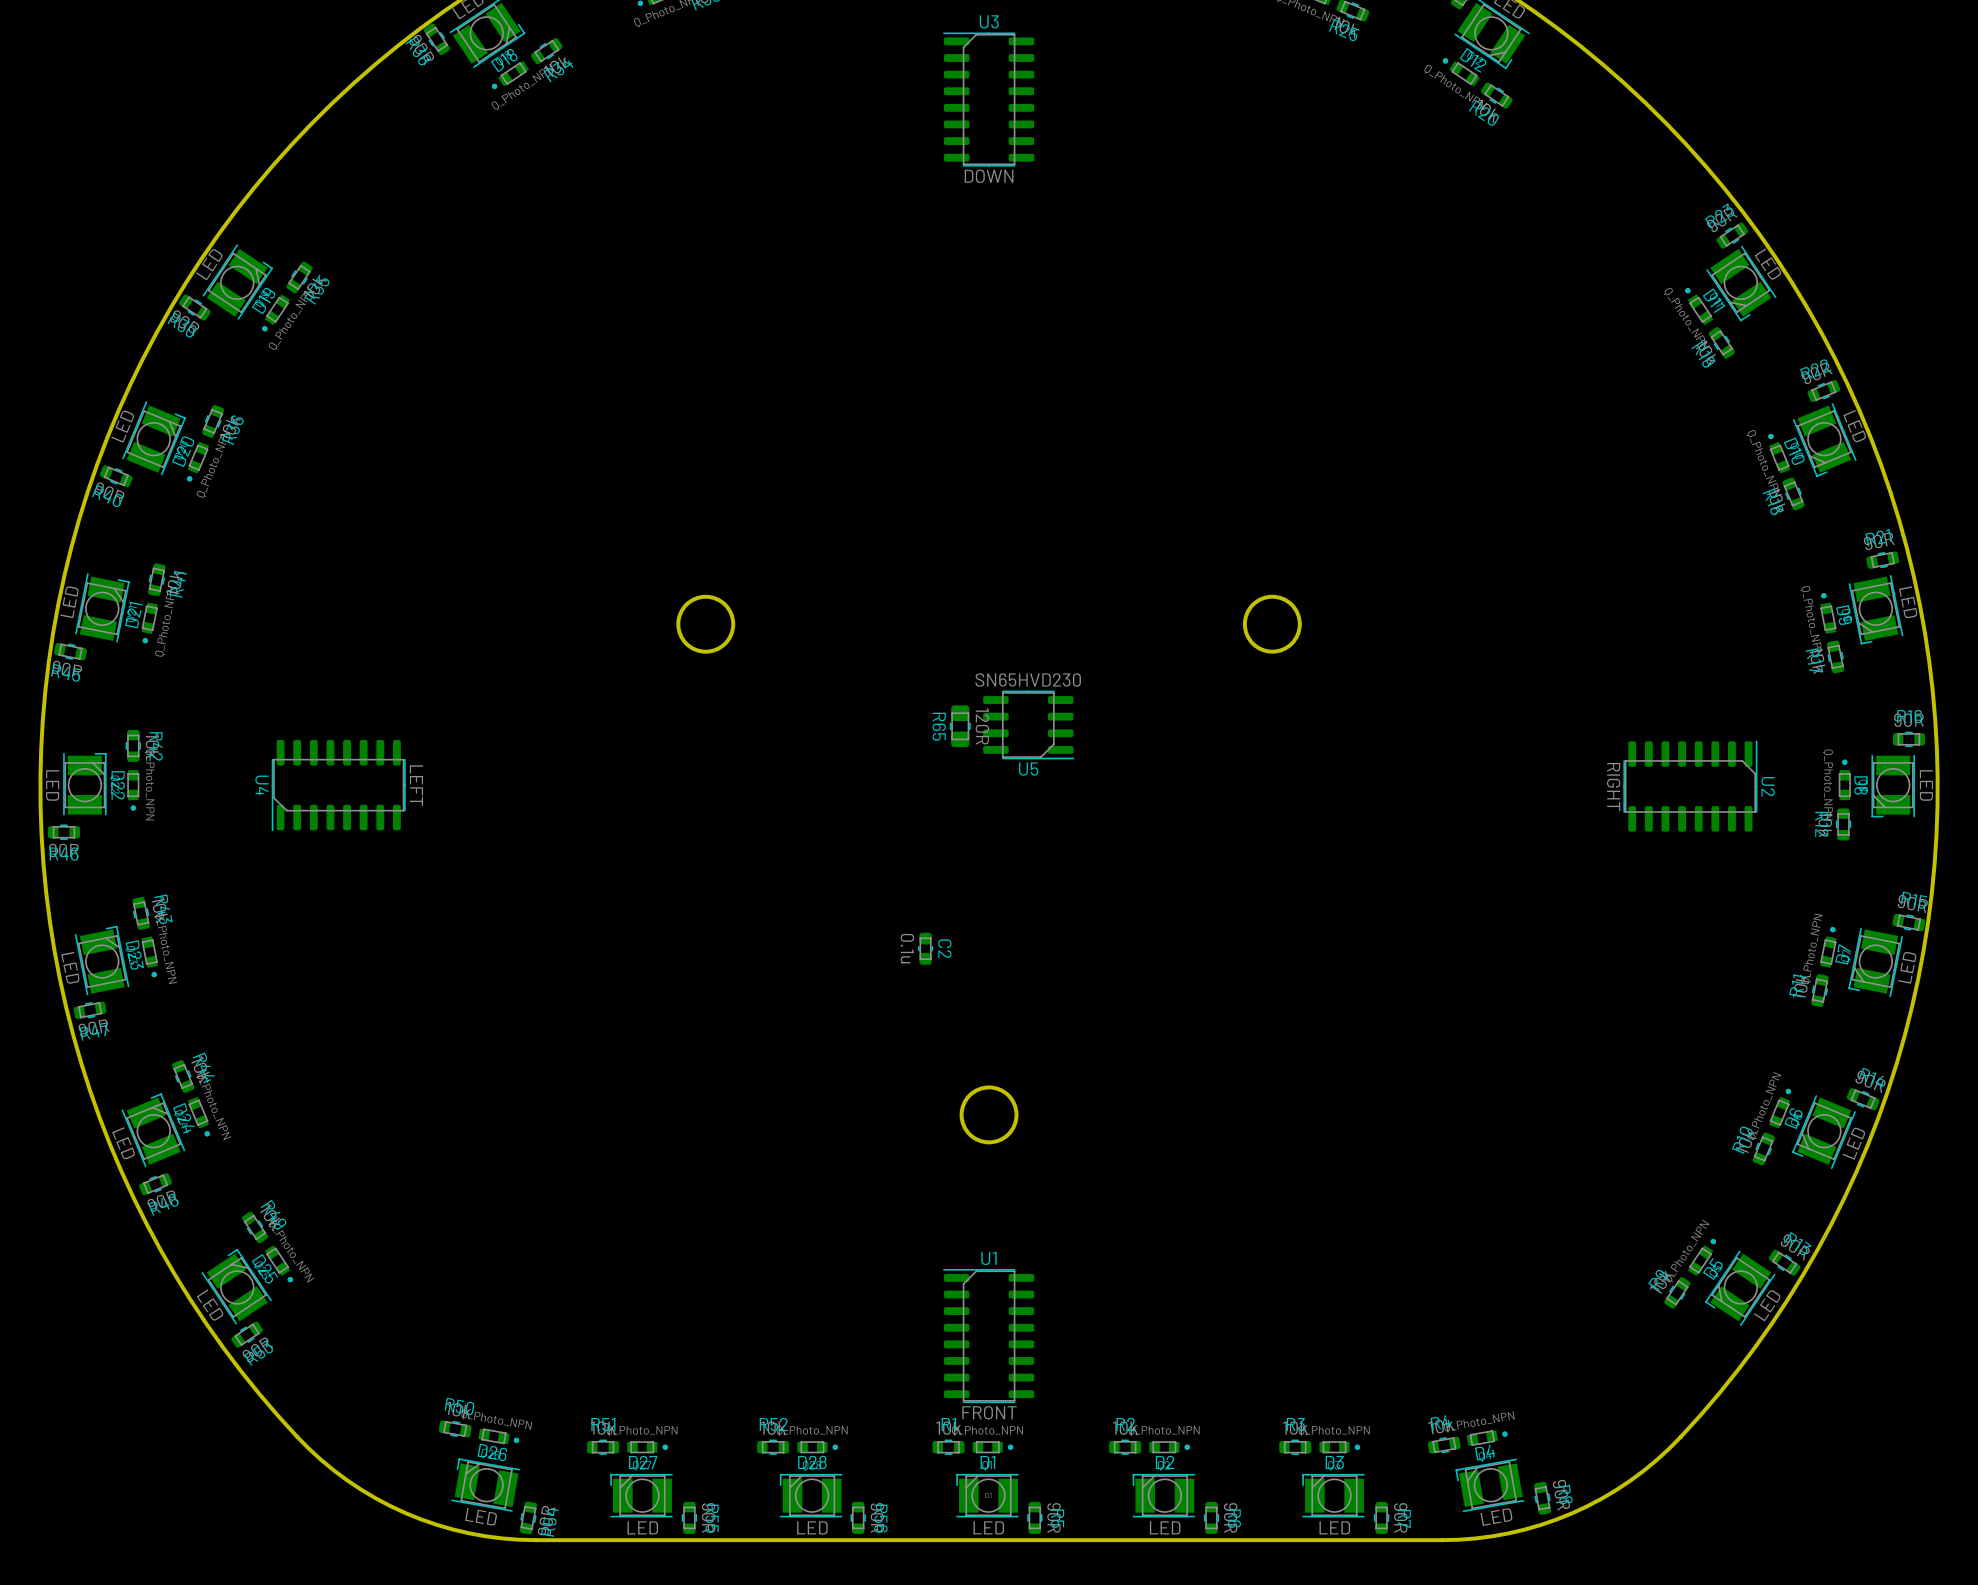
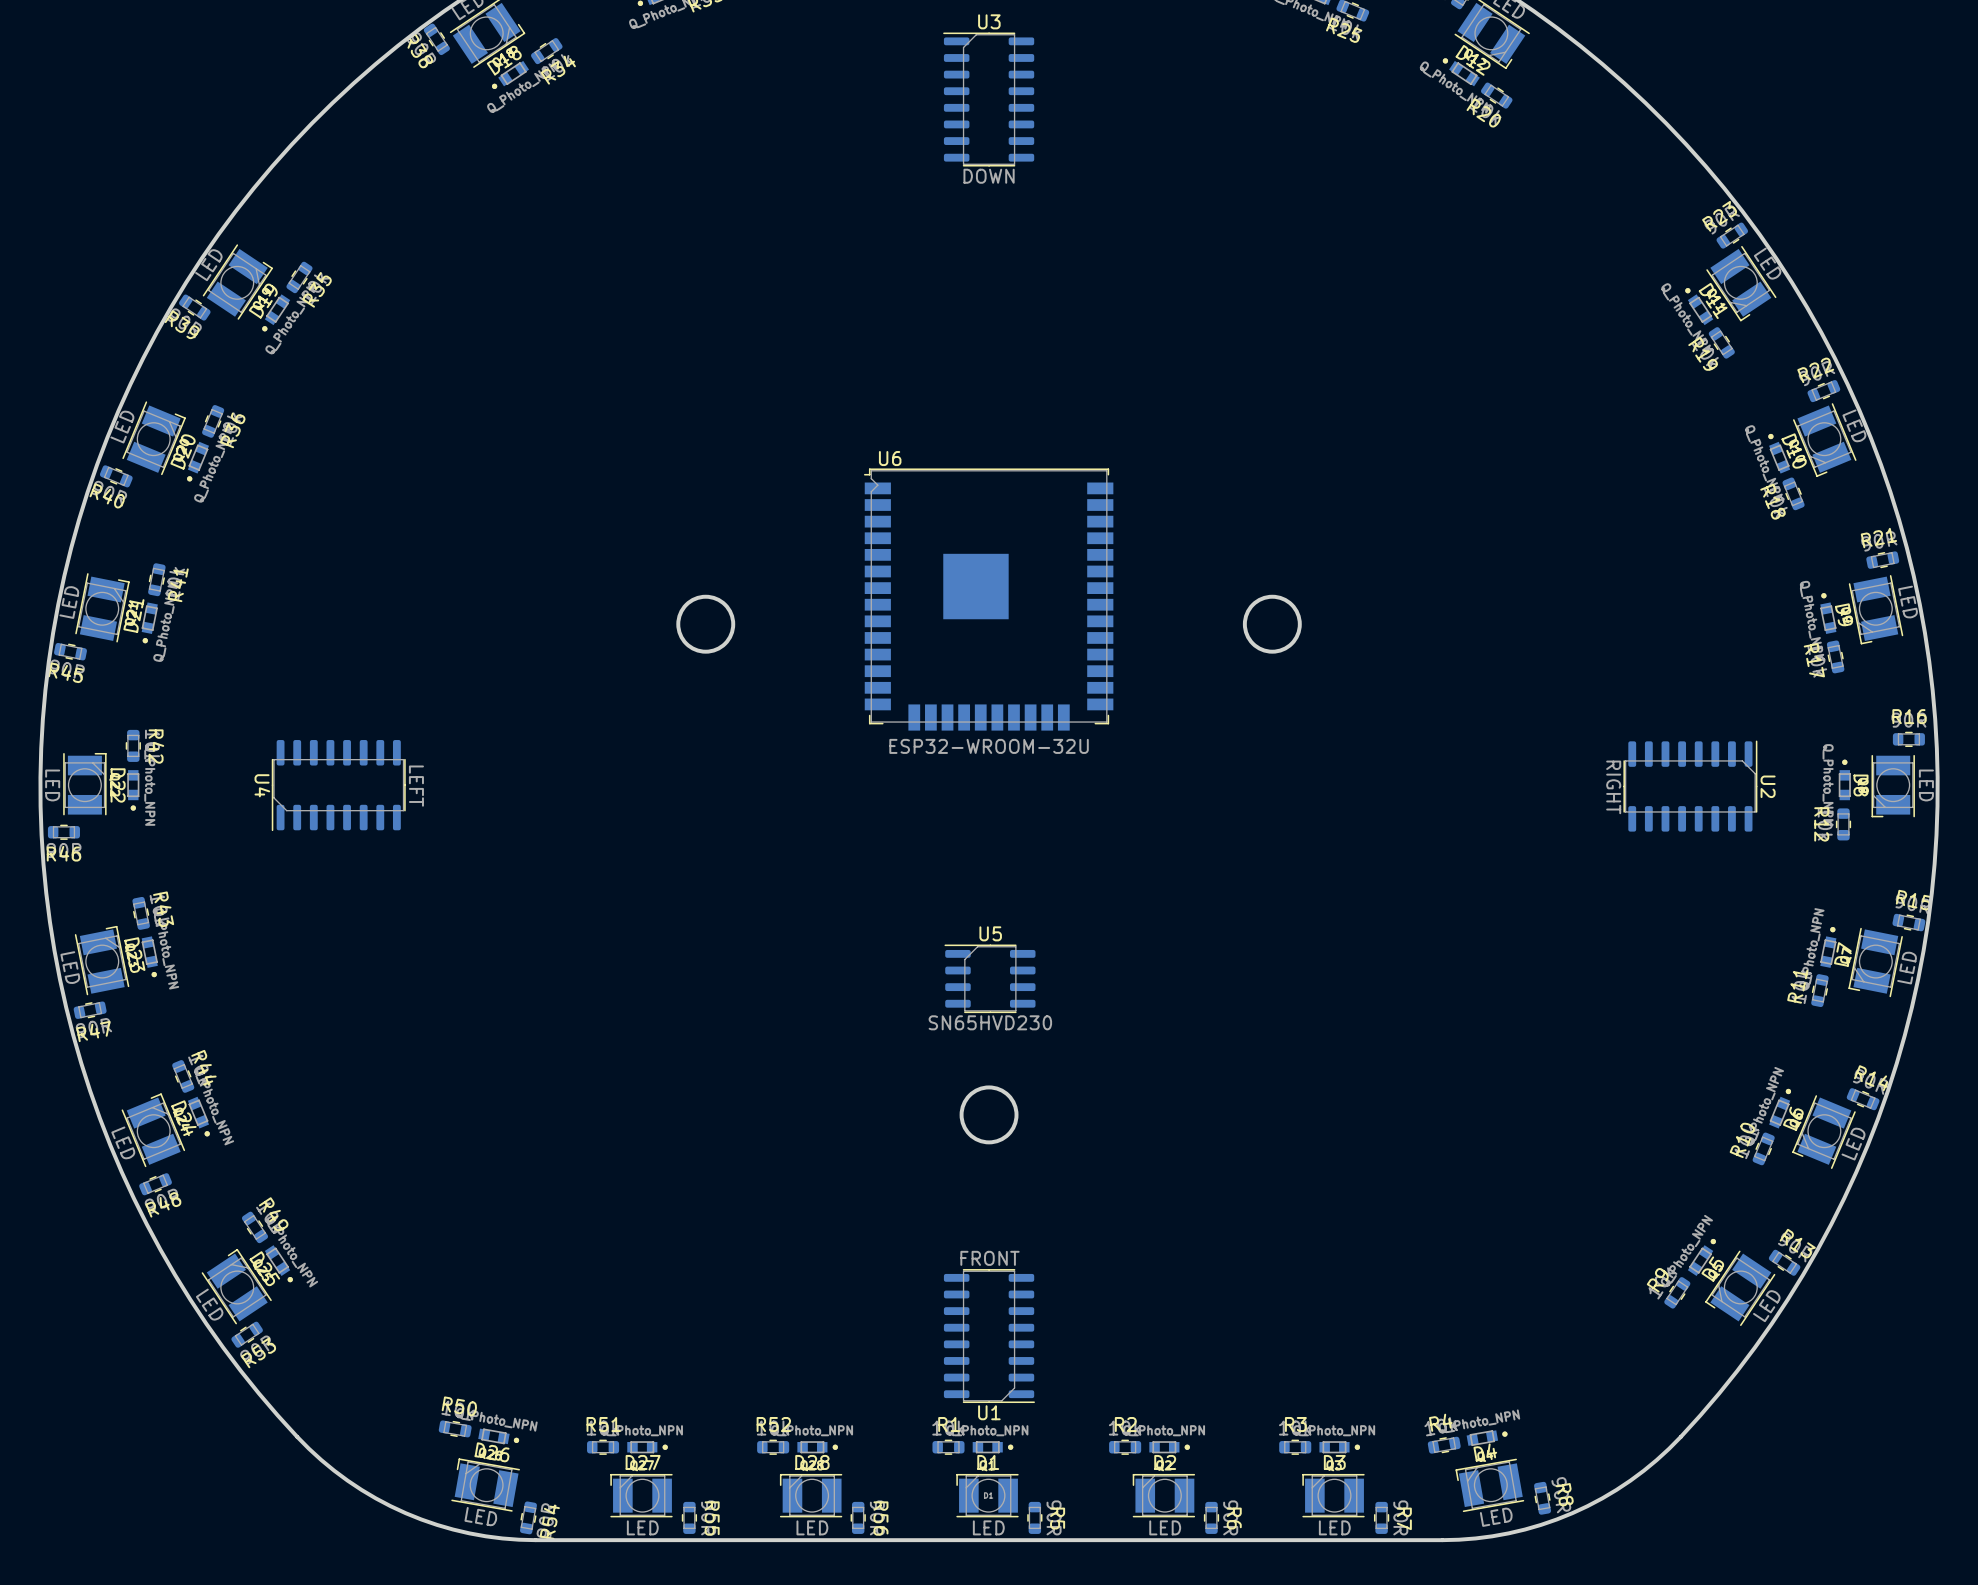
U6: none -> ESP32-WROOM-32U (988, 599)
U5 rotation: 0° (1028, 724) -> 180° (989, 978)
U5 position: (1028, 724) -> (989, 978)
R65: 120R (960, 726) -> none
C2: 0.1u (925, 948) -> none
U1 rotation: 0° (988, 1336) -> 180° (989, 1336)

